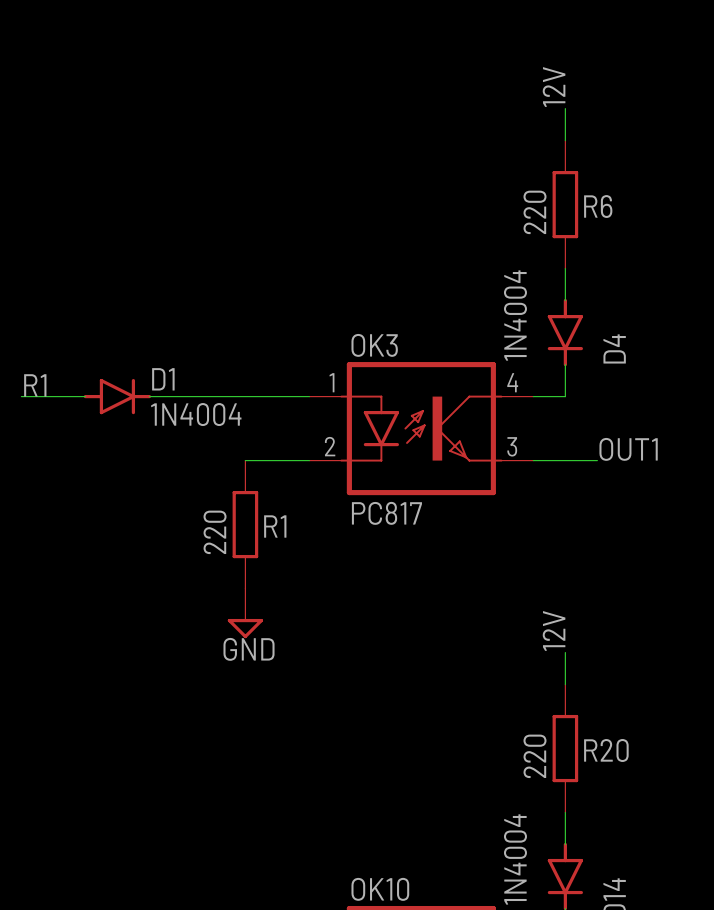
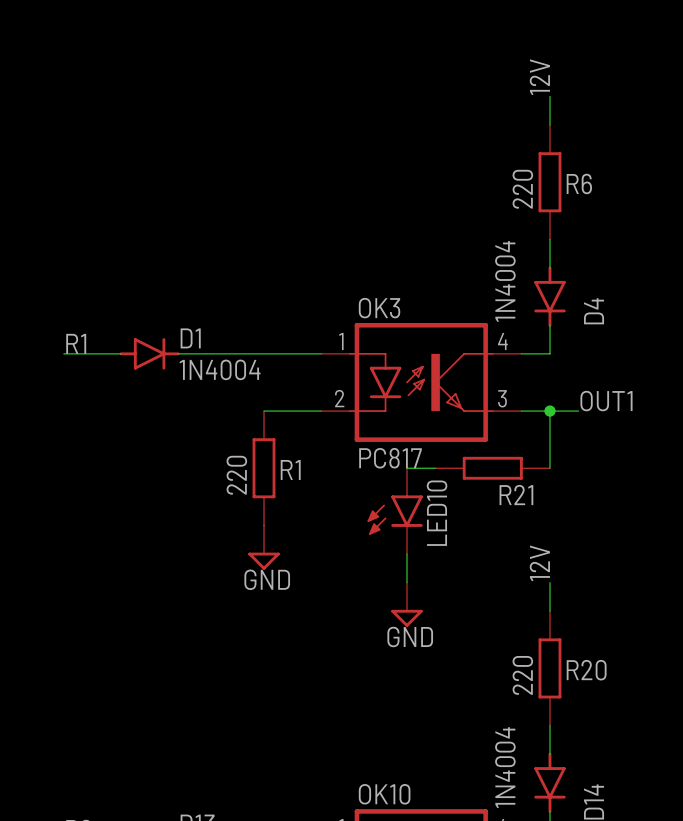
wire: none -> (549, 411) (549, 468)
junction: none -> (549, 411)
wire: none -> (406, 468) (435, 468)
R21: none -> (492, 468)
LED10: none -> (395, 511)
wire: none -> (406, 554) (406, 582)
power symbol: none -> GND (406, 604)

